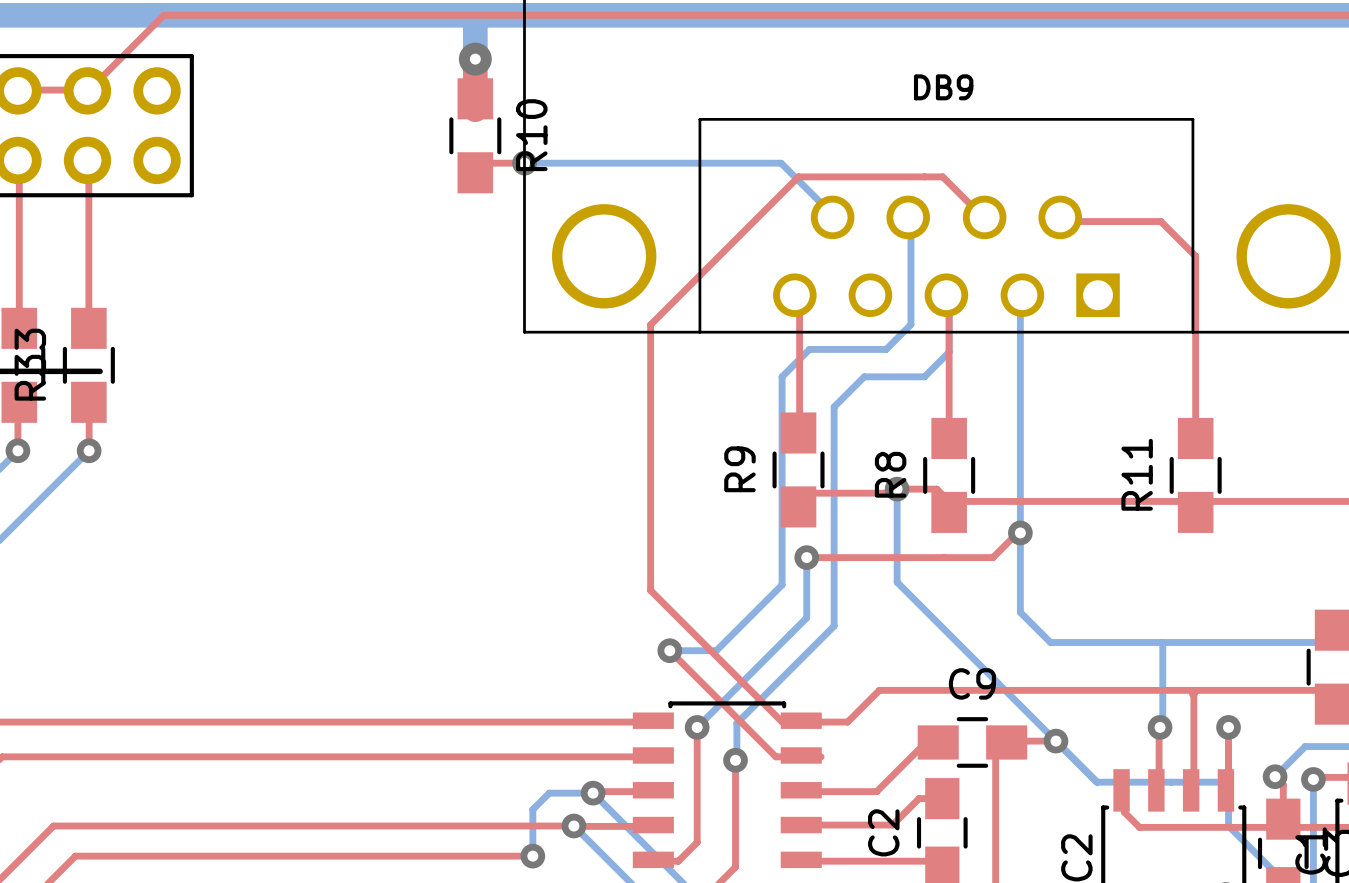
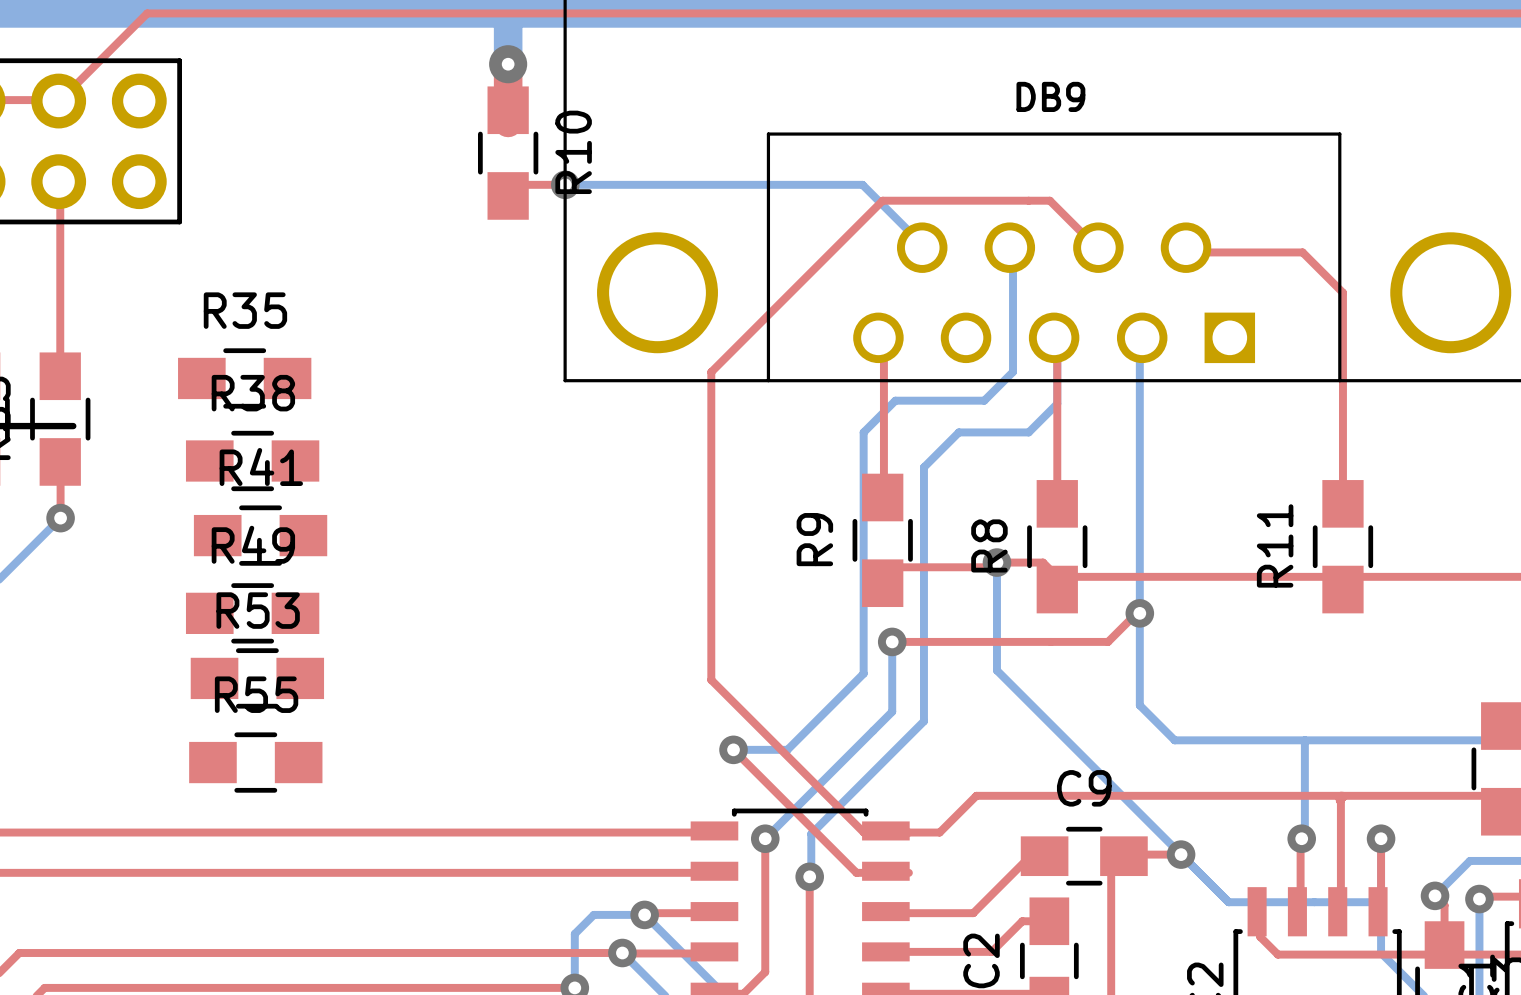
R35: none -> (244, 378)
R38: none -> (252, 460)
R41: none -> (260, 535)
R49: none -> (252, 613)
R53: none -> (257, 678)
R55: none -> (255, 762)

